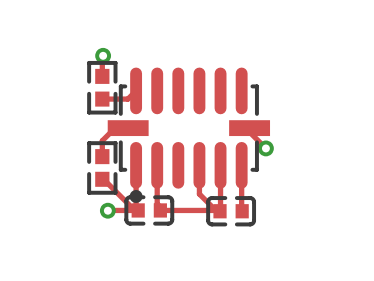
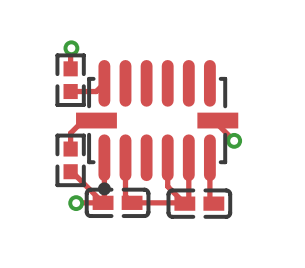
part footprint: [124, 195, 175, 226] -> [84, 187, 151, 219]
part footprint: [206, 196, 257, 227] -> [166, 188, 233, 219]

